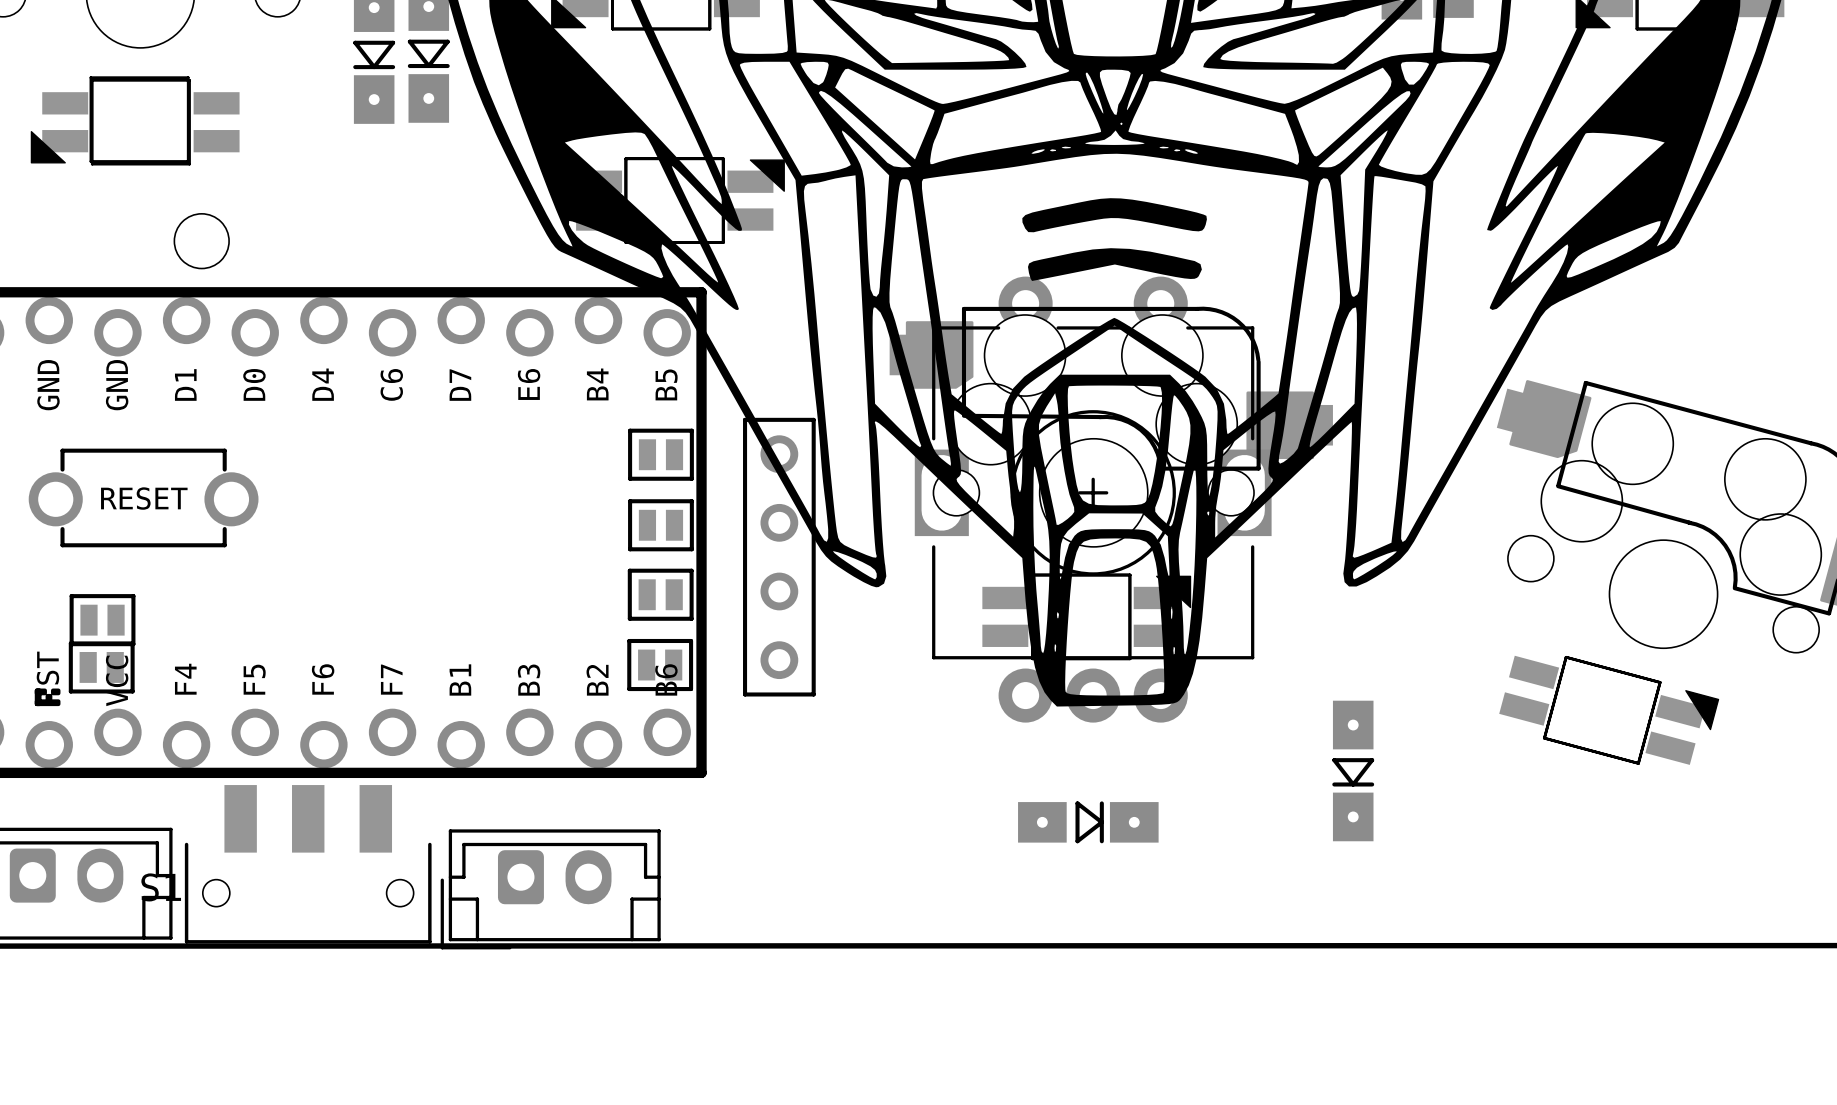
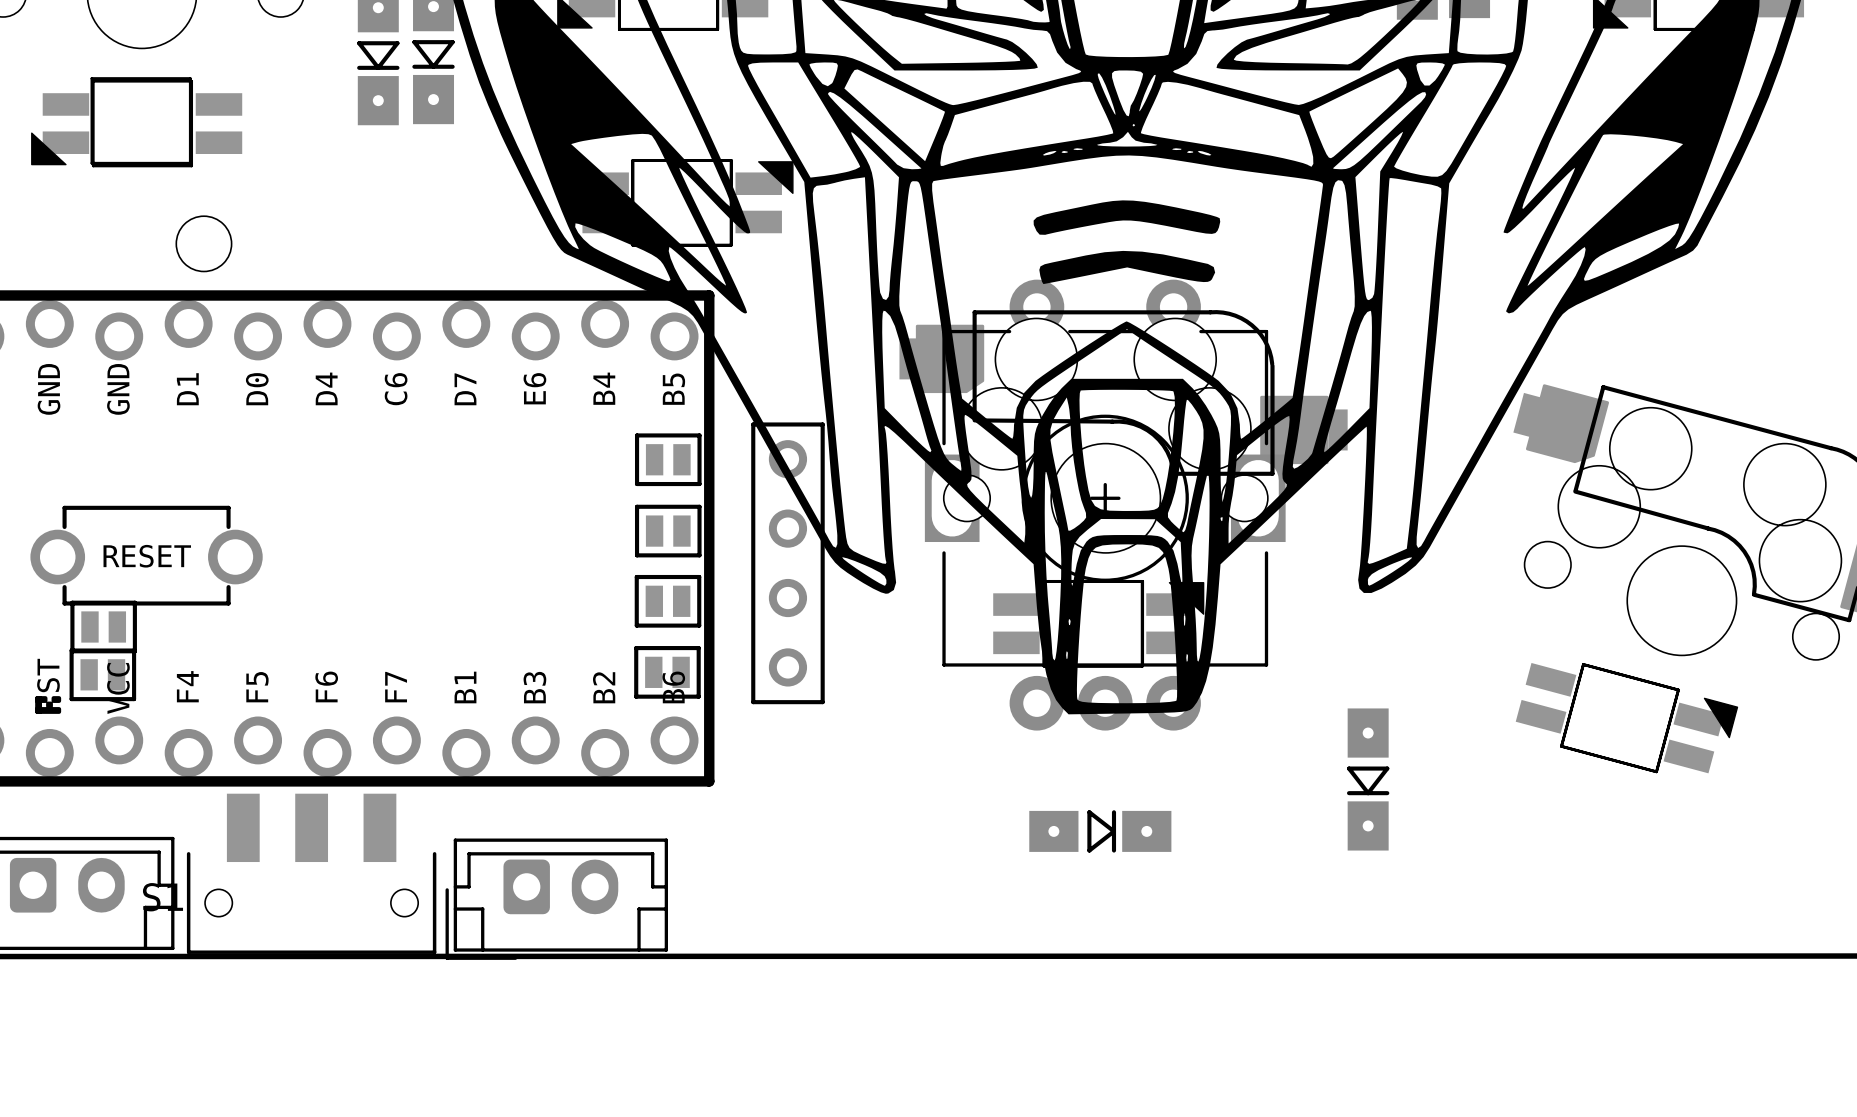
part position: (143, 497) -> (146, 555)

